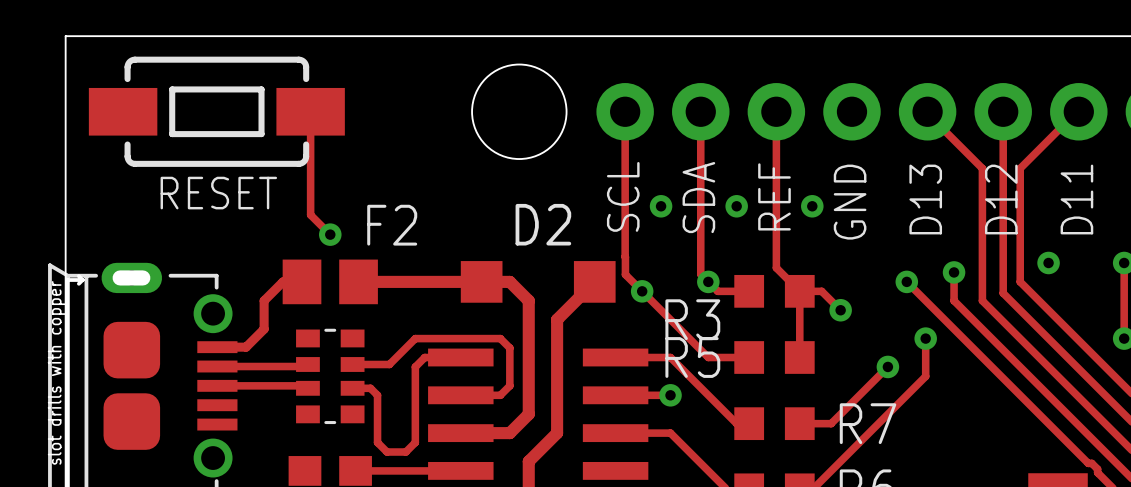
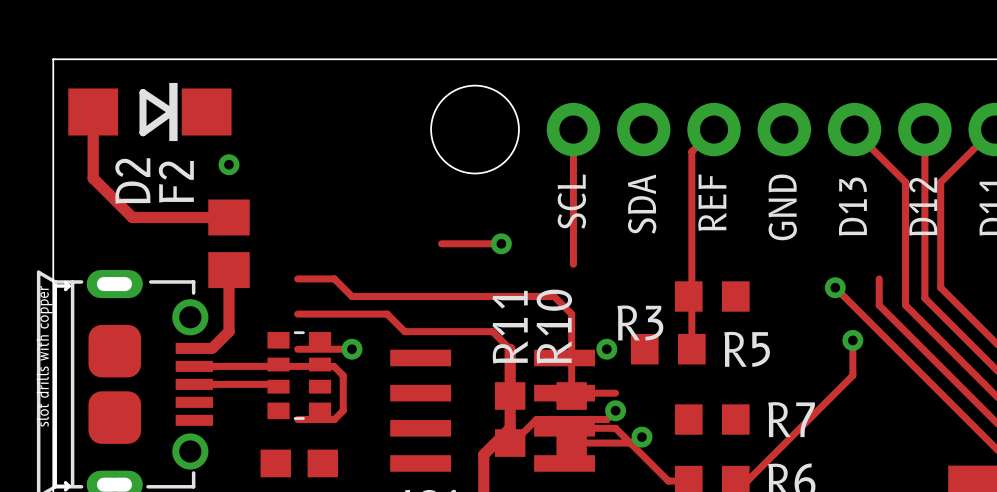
track: none -> (93, 111) (93, 178) (132, 217) (229, 217)
part: (216, 111) -> none
track: (310, 111) (310, 214) (330, 234) -> none
track: (700, 111) (700, 274) (717, 291) (749, 291) -> none
track: (776, 111) (776, 267) (799, 291) -> (714, 129) (691, 151) (691, 349)
via: none -> (229, 164)
text: RESET (218, 193) -> none
via: (661, 206) -> none
via: (736, 206) -> none
via: (812, 206) -> none
D2 name position: D2 (543, 224) -> D2 (132, 180)
F2 name position: F2 (392, 225) -> F2 (176, 181)
via: (330, 234) -> none
track: none -> (441, 243) (501, 243)
via: none -> (501, 243)
track: (625, 256) (625, 274) (708, 357) (749, 357) -> none
D2 footprint: [460, 261, 616, 303] -> [68, 82, 232, 142]
via: (1048, 262) -> none
track: none -> (297, 278) (334, 278) (352, 296) (554, 296) (571, 314) (571, 396)
via: (954, 272) -> none
track: (302, 281) (283, 281) (264, 300) (264, 329) (246, 347) (236, 347) -> (229, 270) (229, 331) (212, 348)
F2 rotation: 0° (330, 281) -> 90° clockwise (229, 243)
F2 position: (330, 281) -> (229, 243)
track: (358, 281) (509, 281) (528, 300) (528, 414) (509, 433) (460, 433) -> none
via: (708, 281) -> none
track: (594, 282) (557, 319) (557, 348) -> (297, 314) (387, 314) (404, 331) (492, 331) (510, 349)
via: (642, 291) -> none
track: (799, 291) (799, 357) -> none
track: (799, 291) (821, 291) (840, 310) -> none
via: (840, 310) -> none
track: none -> (297, 349) (352, 349)
via: none -> (352, 349)
via: none -> (606, 349)
track: (460, 357) (424, 357) (415, 366) (415, 442) (405, 452) (386, 452) (377, 442) (377, 414) -> (297, 419) (334, 419) (343, 410)
track: (615, 357) (670, 357) (736, 423) (749, 423) -> none
R5 name position: R5 (692, 357) -> R5 (747, 349)
R5 position: (774, 357) -> (668, 349)
track: (352, 364) (389, 364) (415, 338) (500, 338) (509, 348) (509, 385) (500, 395) (460, 395) -> none
track: (887, 366) (831, 423) (799, 423) -> none
via: (887, 366) -> none
track: (352, 388) (370, 388) (377, 395) -> (276, 366) (334, 366) (343, 375) (343, 393)
via position: (670, 395) -> (615, 410)
track: none -> (615, 410) (606, 419) (536, 419) (513, 443) (510, 443)
R11: none -> (510, 419)
R10: none -> (571, 419)
track: none -> (641, 437) (636, 443) (571, 443)
via: none -> (641, 437)
track: (355, 470) (460, 470) -> none

